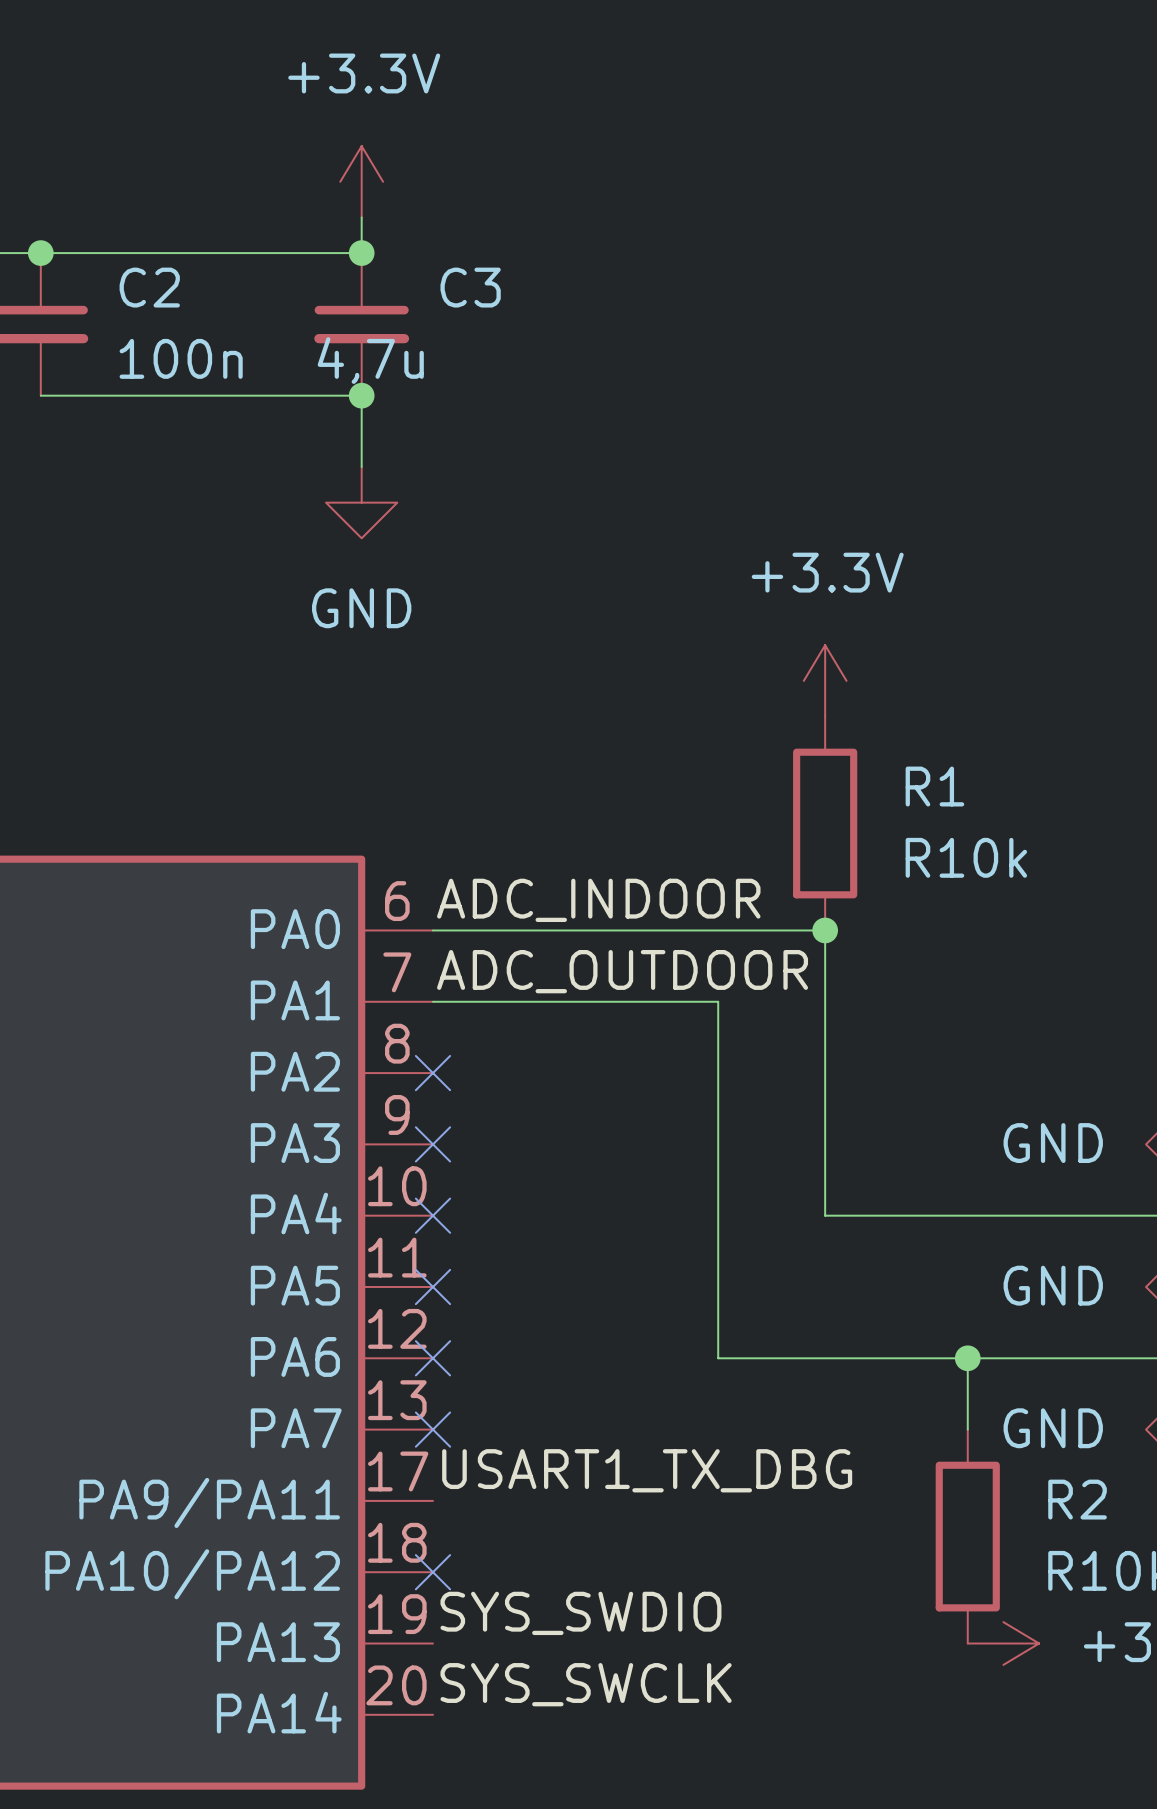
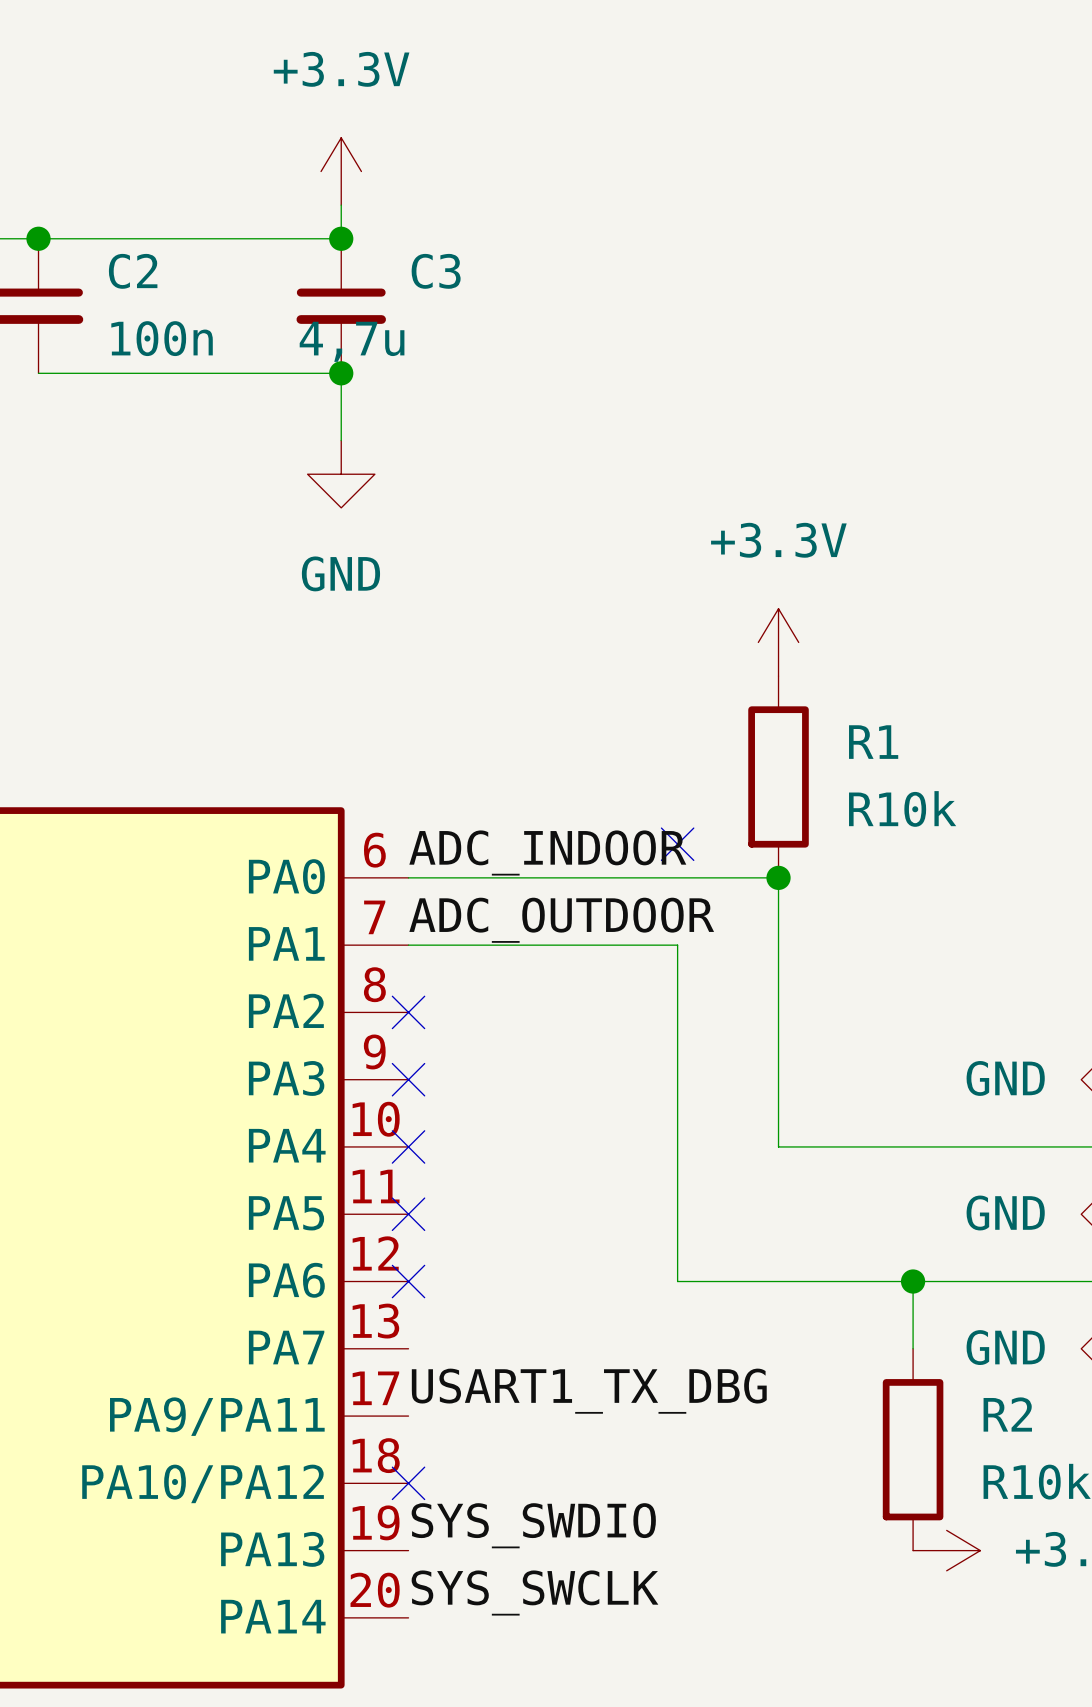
no-connect mark: none -> (677, 844)
no-connect mark: (432, 1429) -> none

